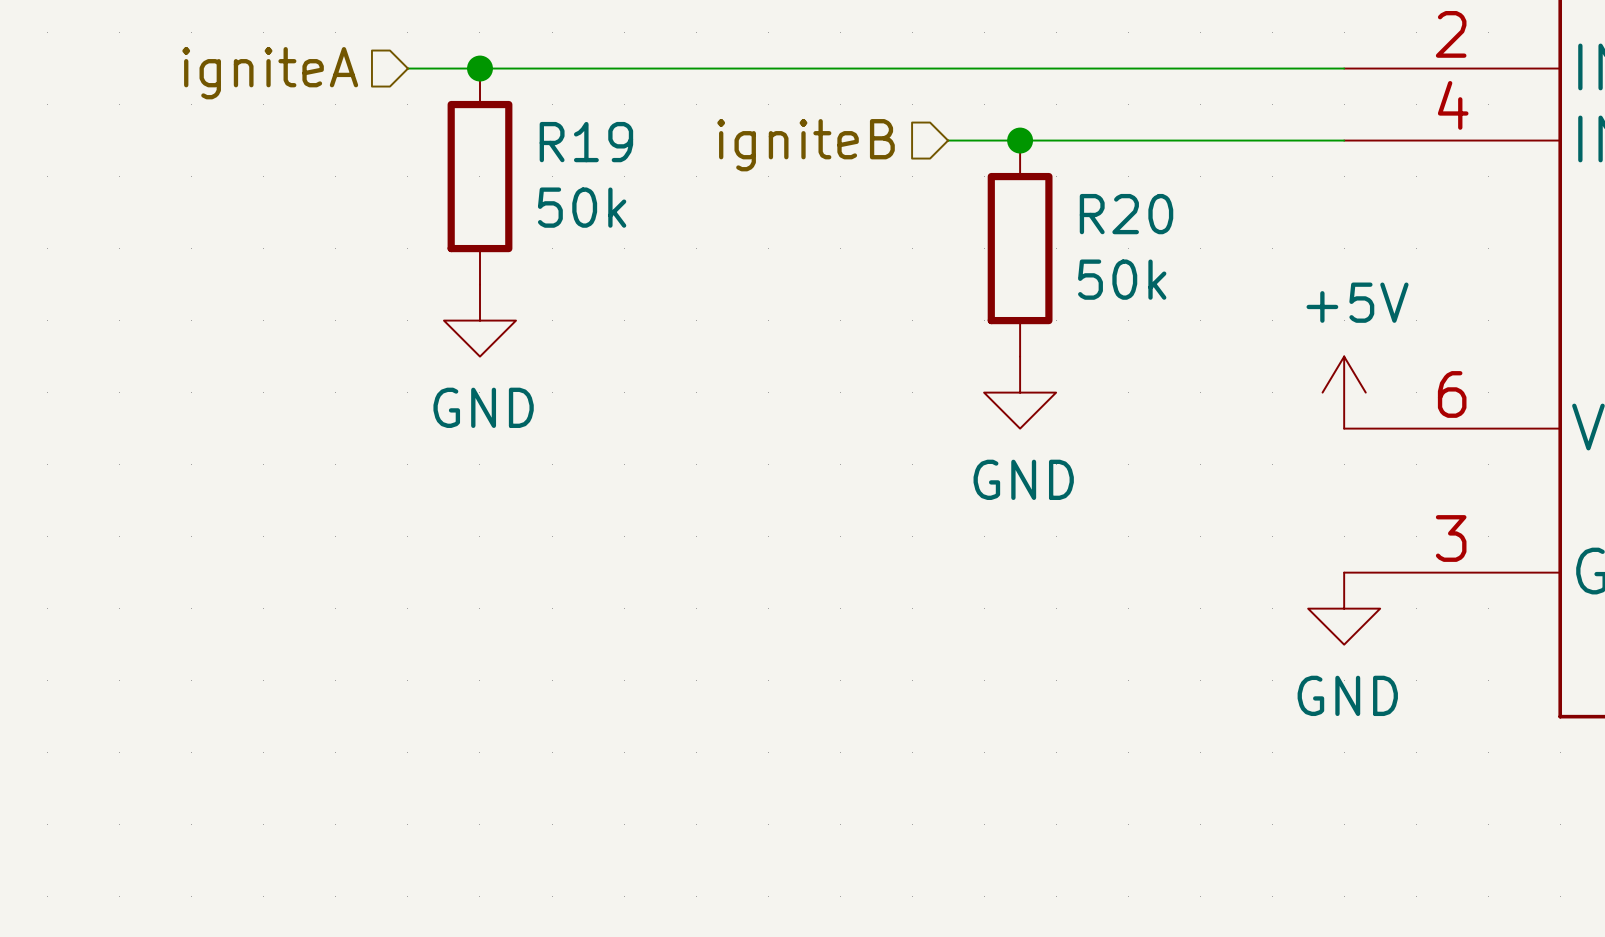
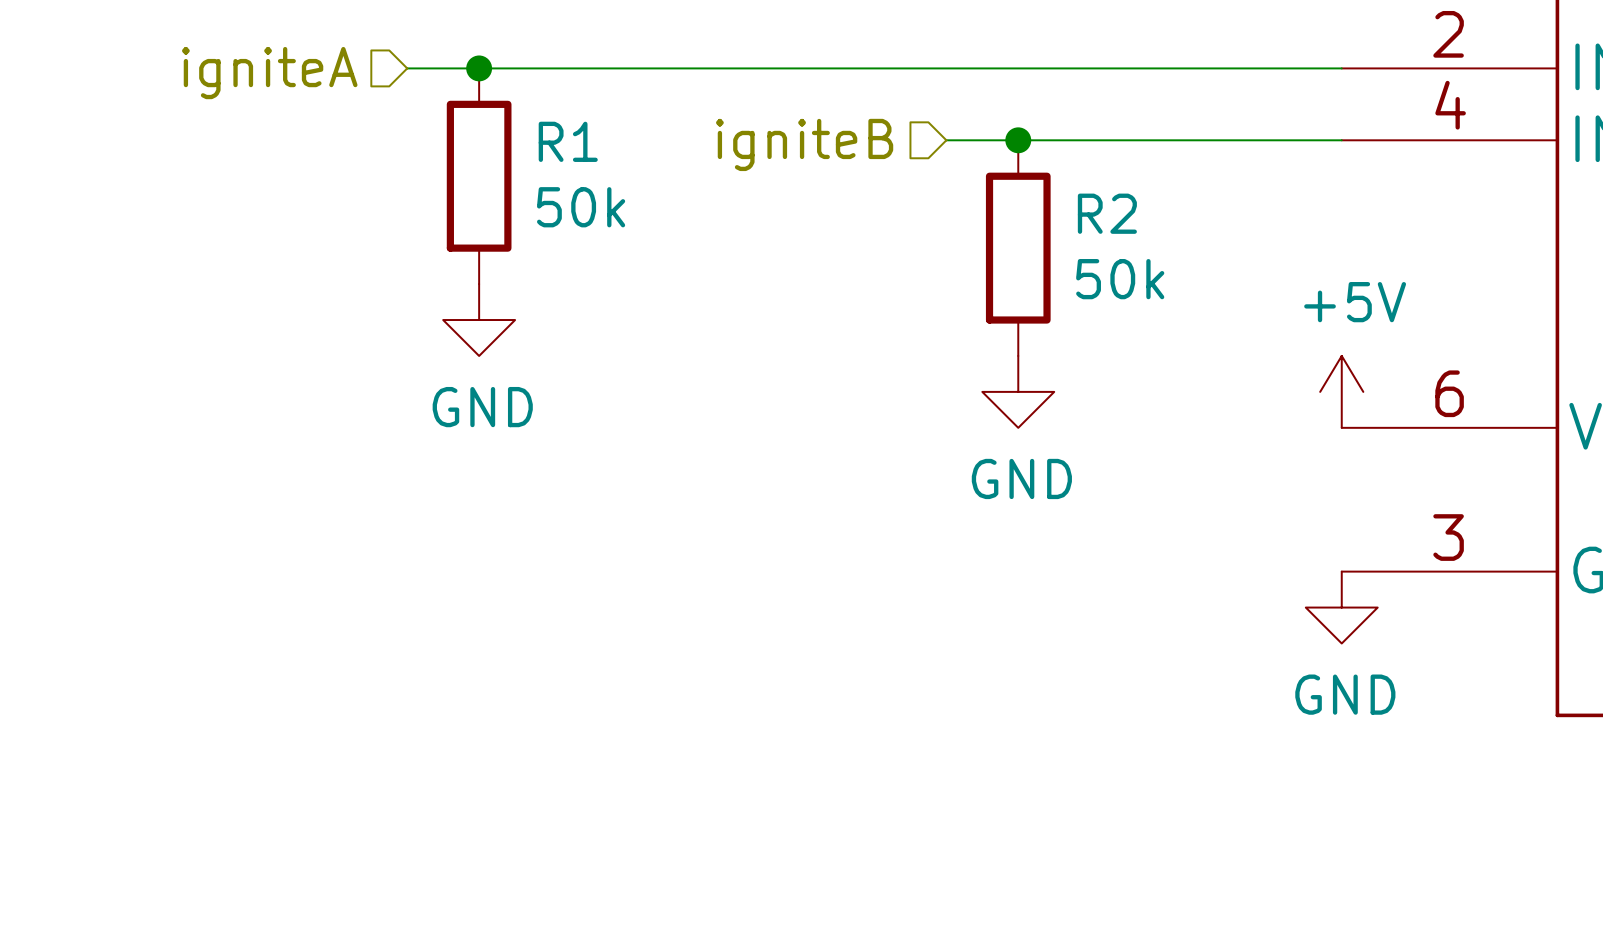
R19 name: R19 (586, 142) -> R1 (568, 141)
R20 name: R20 (1126, 214) -> R2 (1107, 213)

